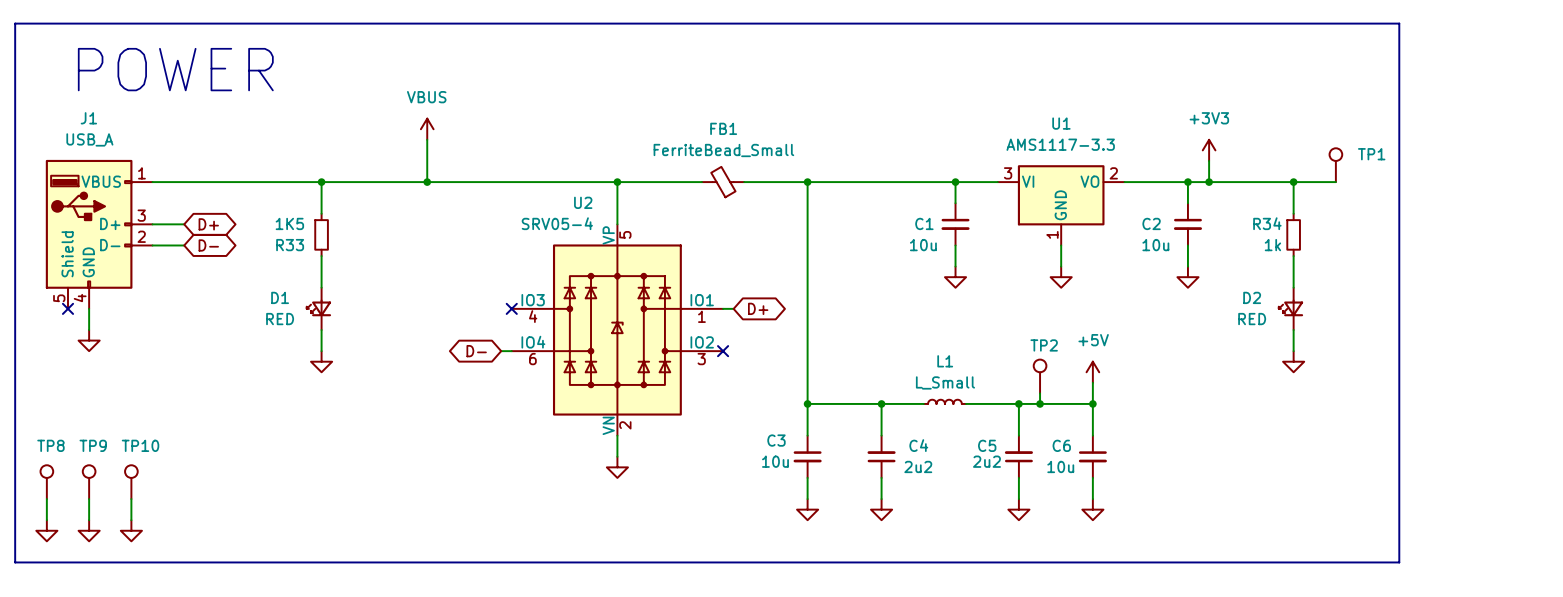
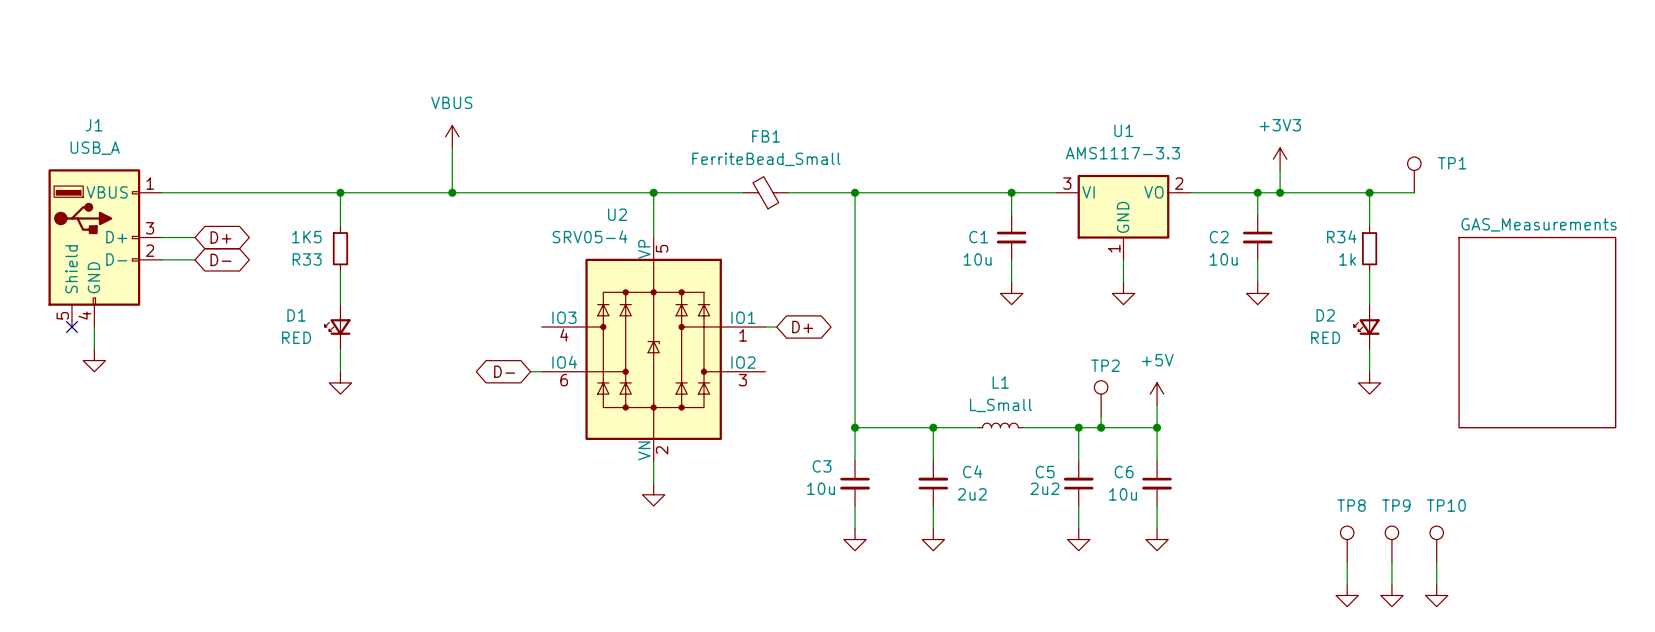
line: (15, 23) (1399, 23) (1399, 562) (15, 562) (15, 23) -> none
text: POWER (175, 69) -> none
no-connect mark: (511, 308) -> none
sheet GAS_Measurements: none -> (1537, 332)
no-connect mark: (723, 351) -> none
TP8 position: (46, 482) -> (1347, 544)
TP9 position: (89, 482) -> (1391, 544)
TP10 position: (131, 482) -> (1436, 544)
wire: (46, 499) (46, 520) -> none
wire: (89, 499) (89, 520) -> none
wire: (131, 499) (131, 520) -> none
power symbol: (46, 530) -> none
power symbol: (89, 530) -> none
power symbol: (131, 530) -> none
wire: none -> (1347, 561) (1347, 584)
wire: none -> (1391, 561) (1391, 584)
wire: none -> (1436, 561) (1436, 584)
power symbol: none -> (1347, 595)
power symbol: none -> (1391, 595)
power symbol: none -> (1436, 595)

